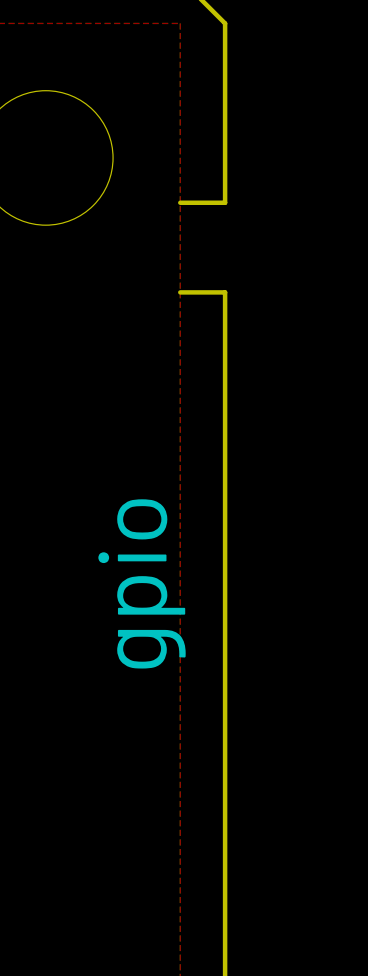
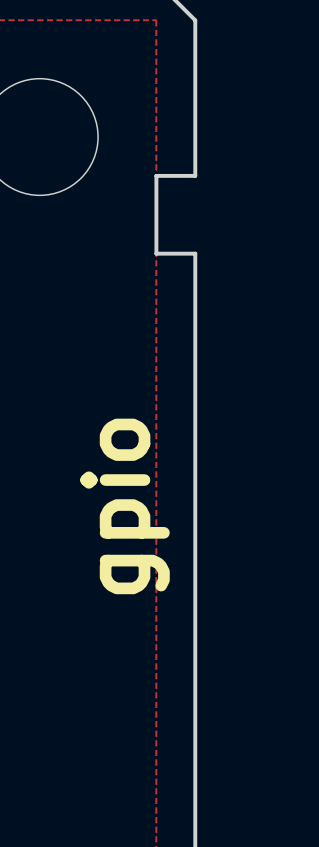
board edge: none -> (156, 175) (156, 253)

